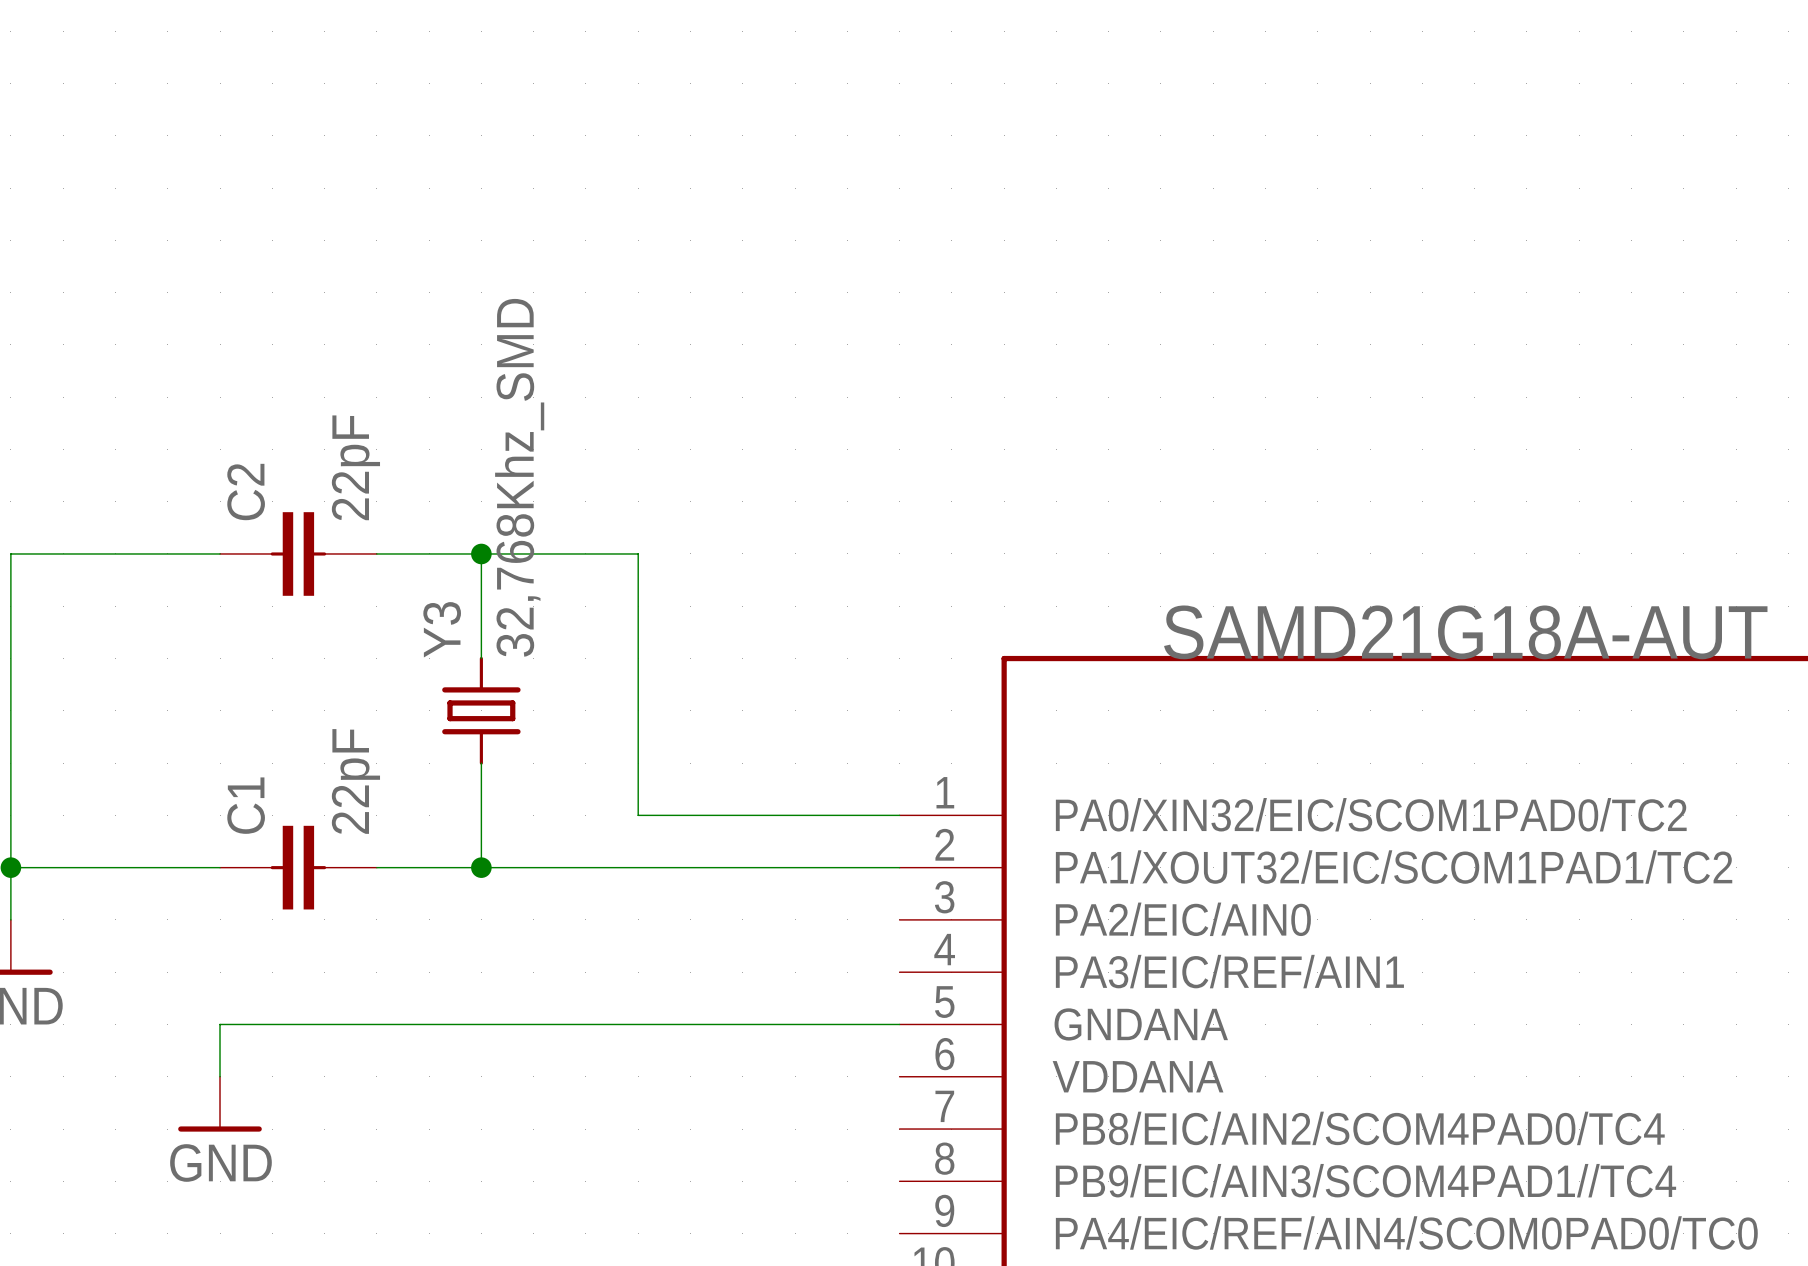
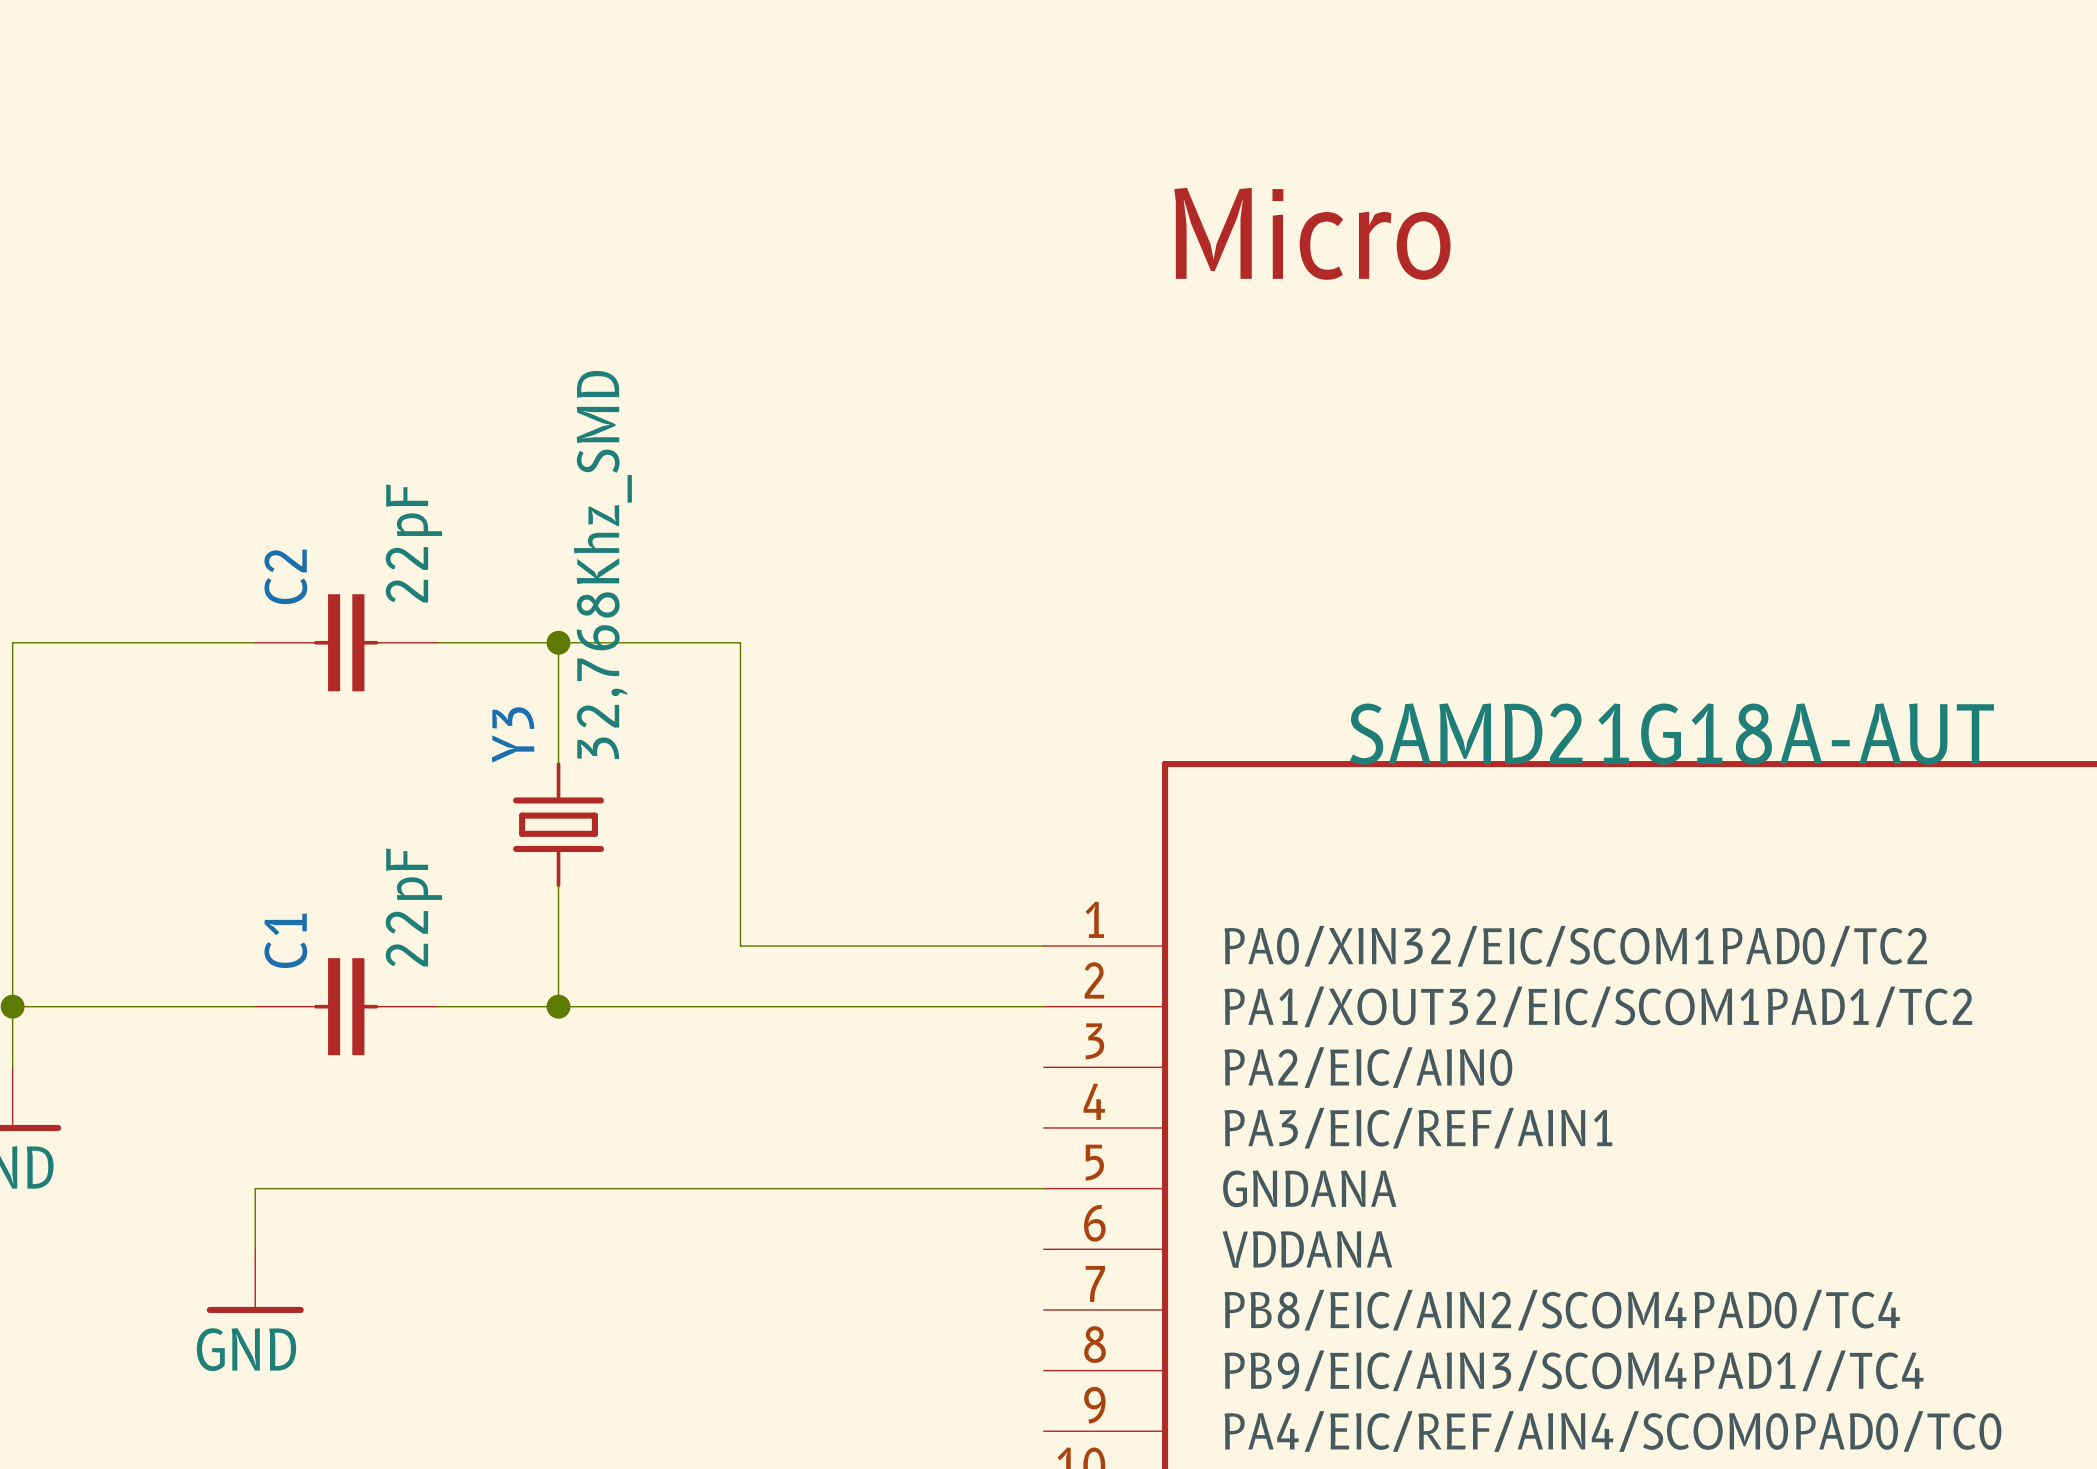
text: none -> Micro (1312, 233)

